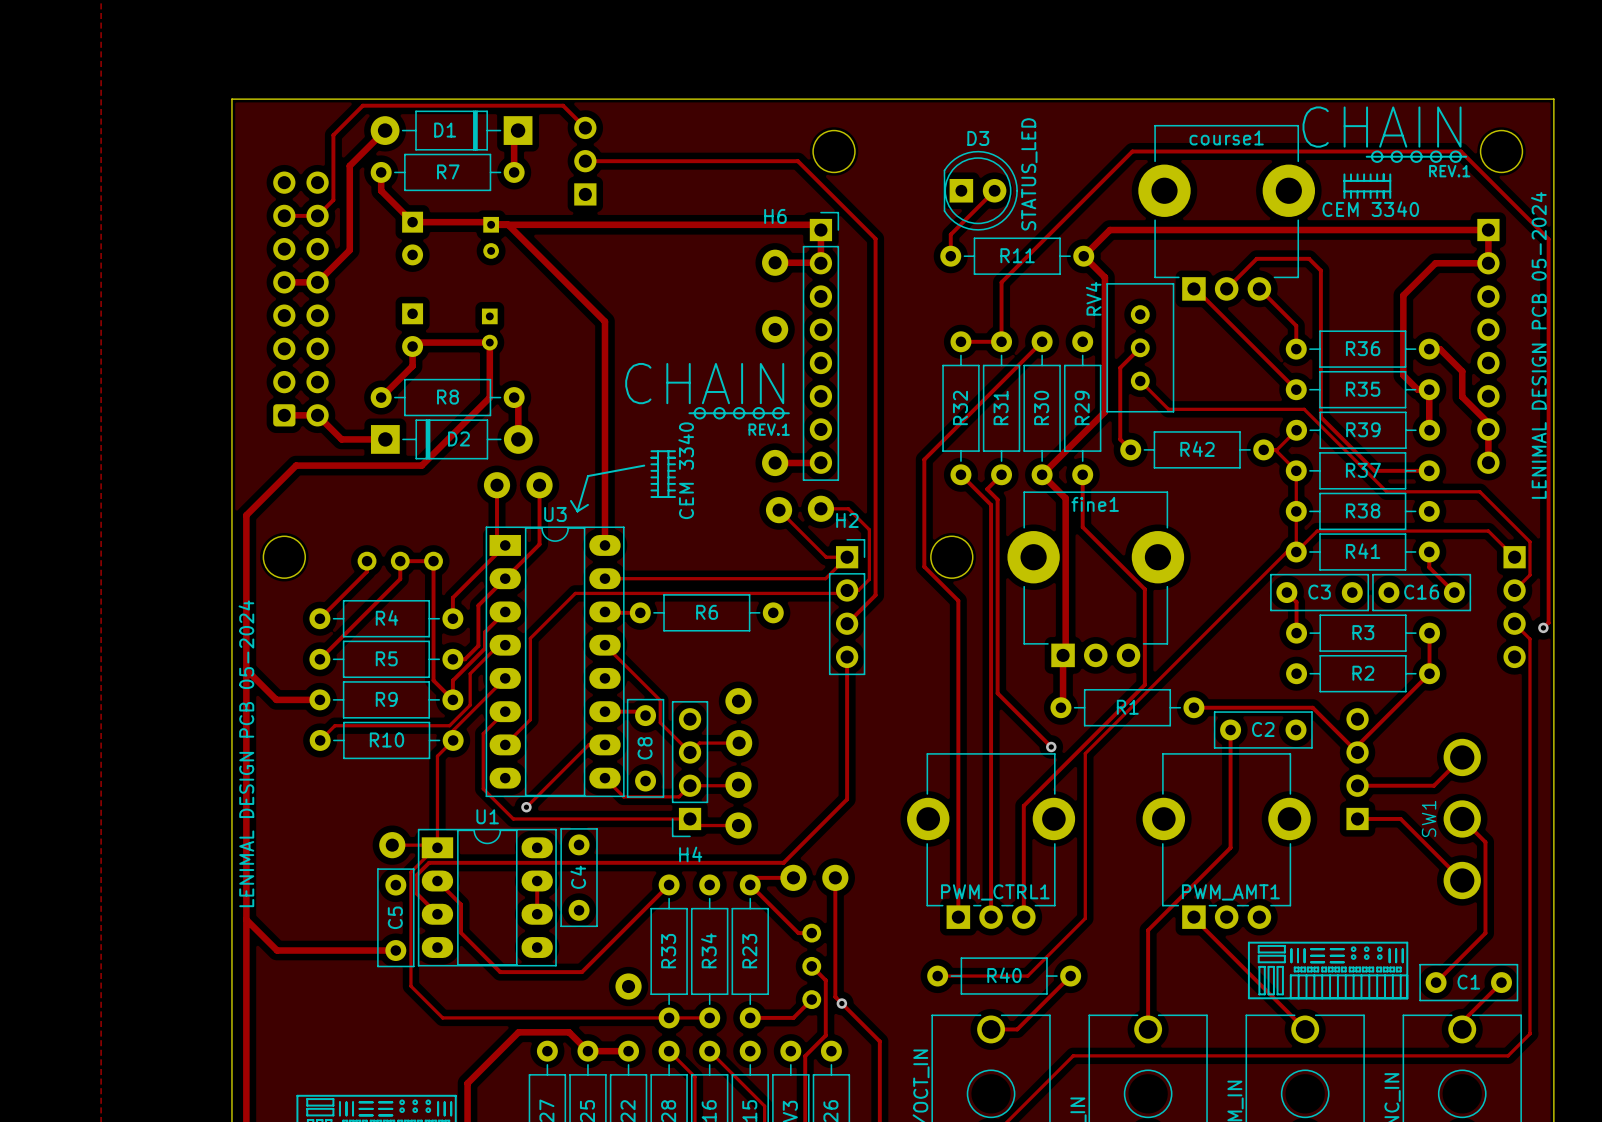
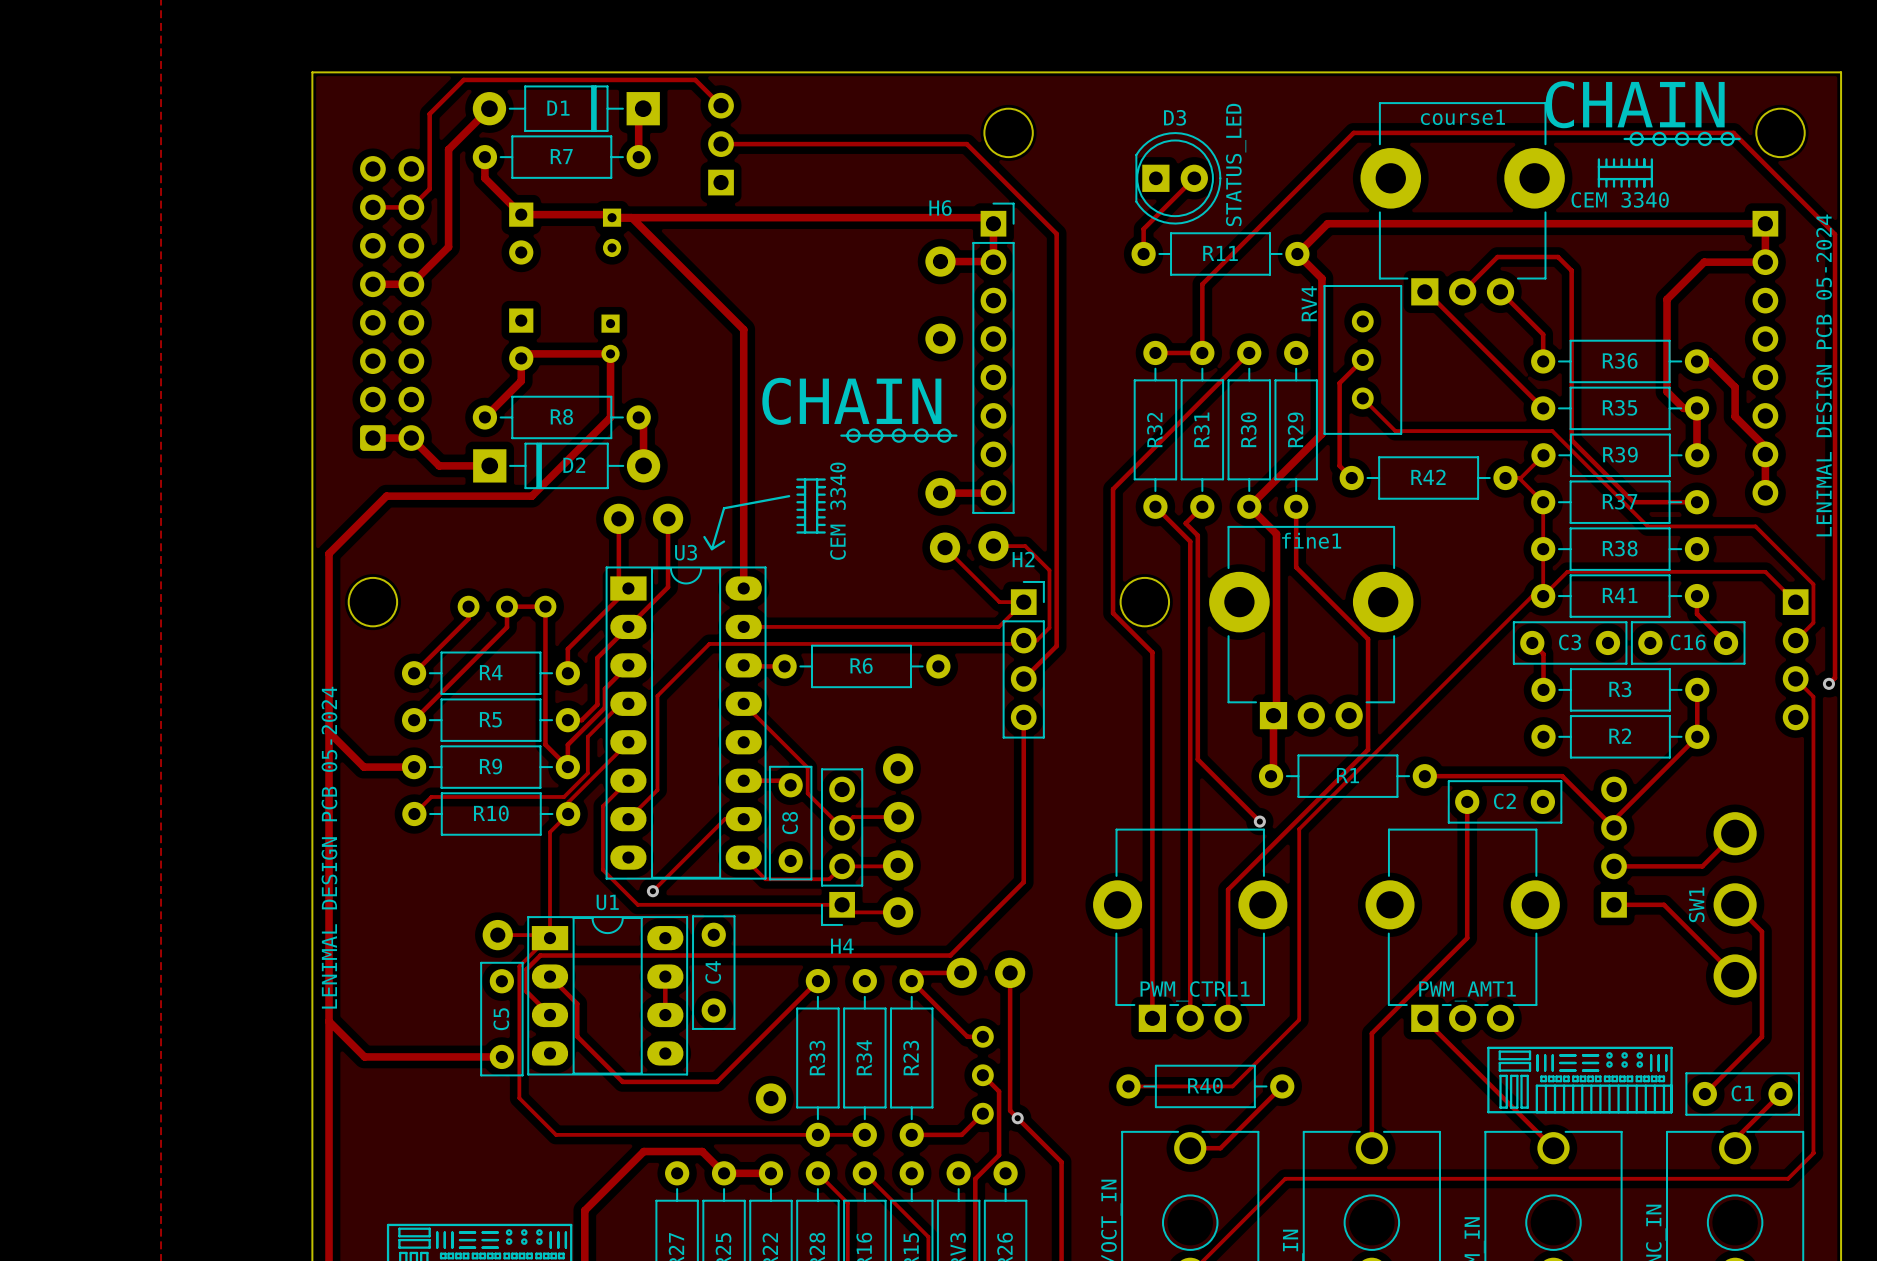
text: REV.1 (1449, 171) -> none
text: REV.1 (769, 429) -> none

